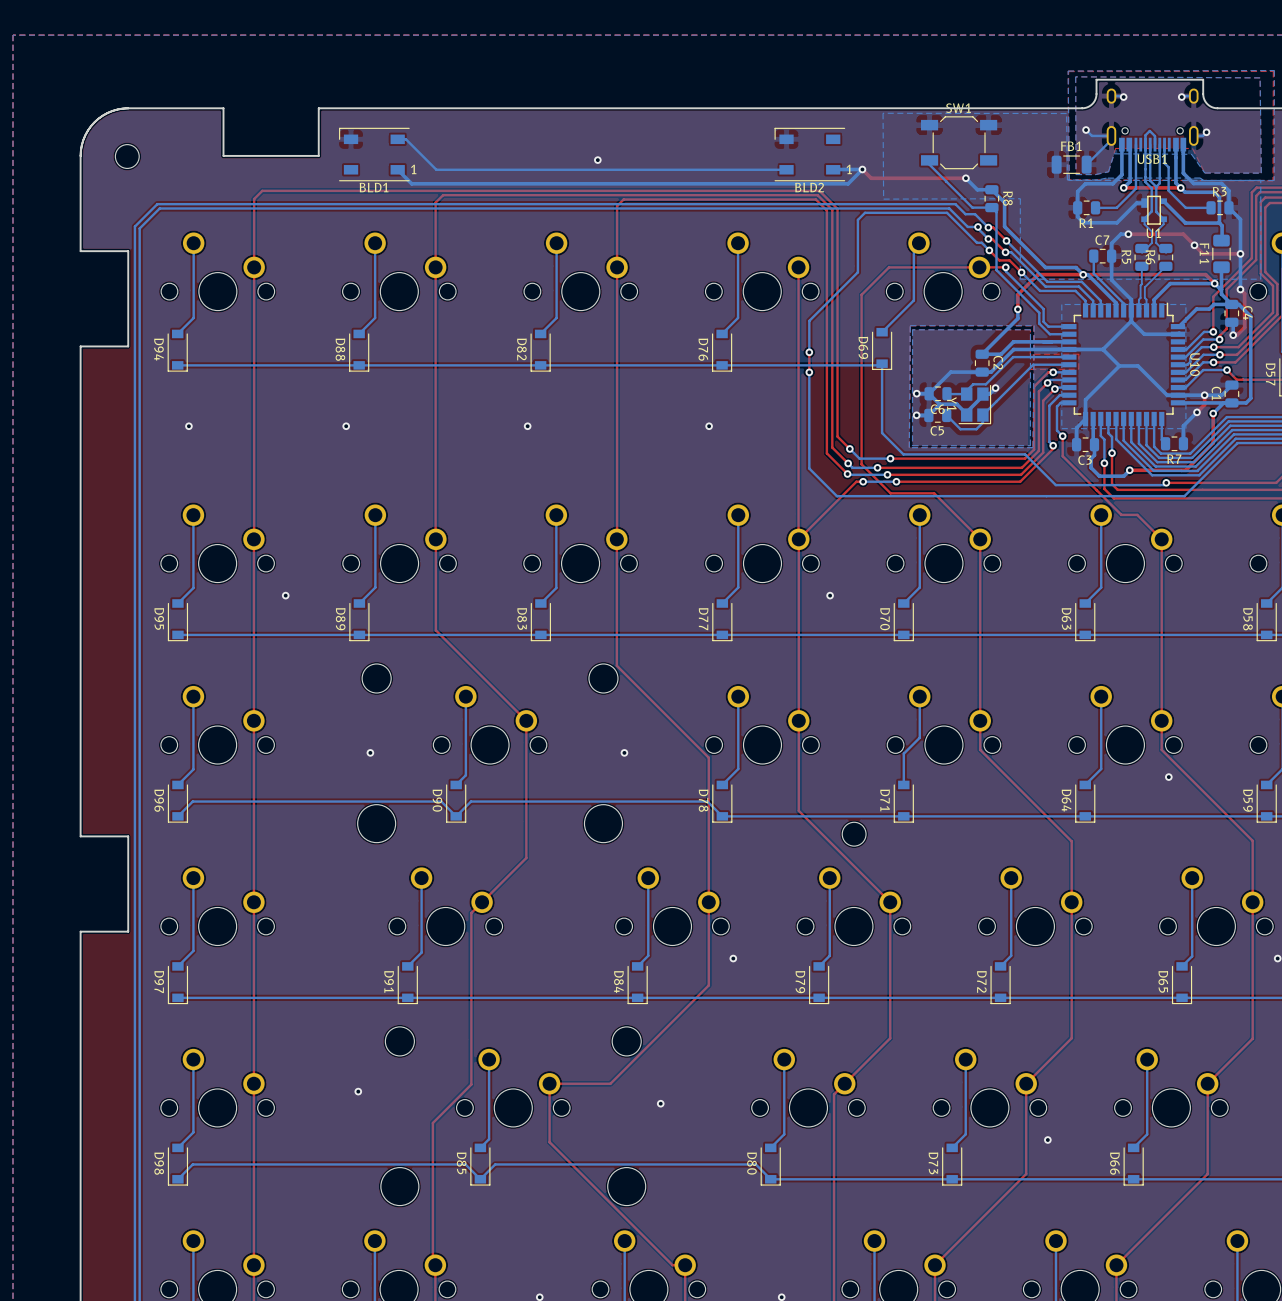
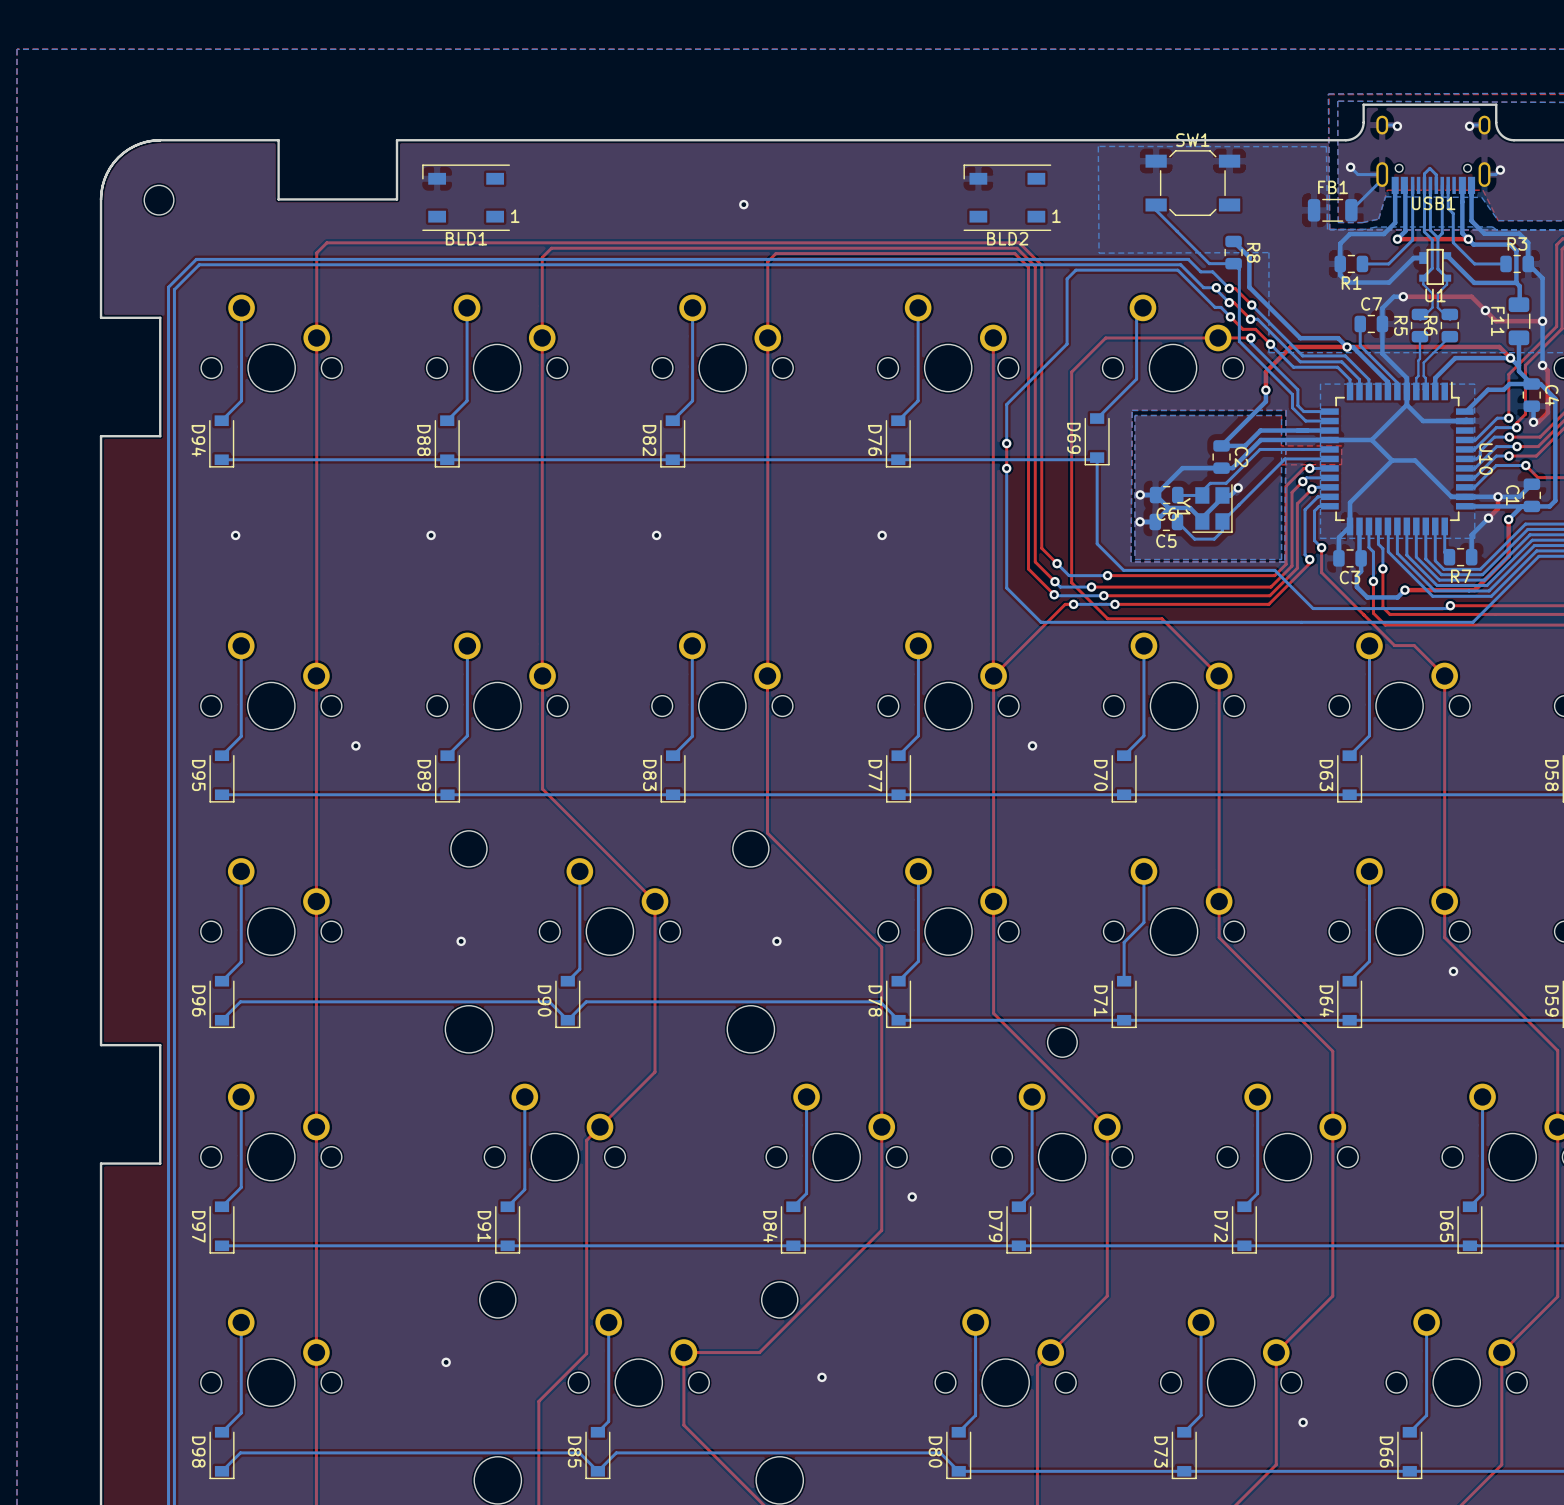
bottom track: (397, 139) (405, 139) (436, 169) (786, 169) -> none
bottom track: (833, 169) (862, 169) (848, 183) (411, 183) (397, 169) -> none
top track: (862, 169) (871, 178) (965, 178) -> none
via: (862, 169) -> none
bottom track: (965, 178) (977, 189) (991, 189) -> none
via: (965, 178) -> none

